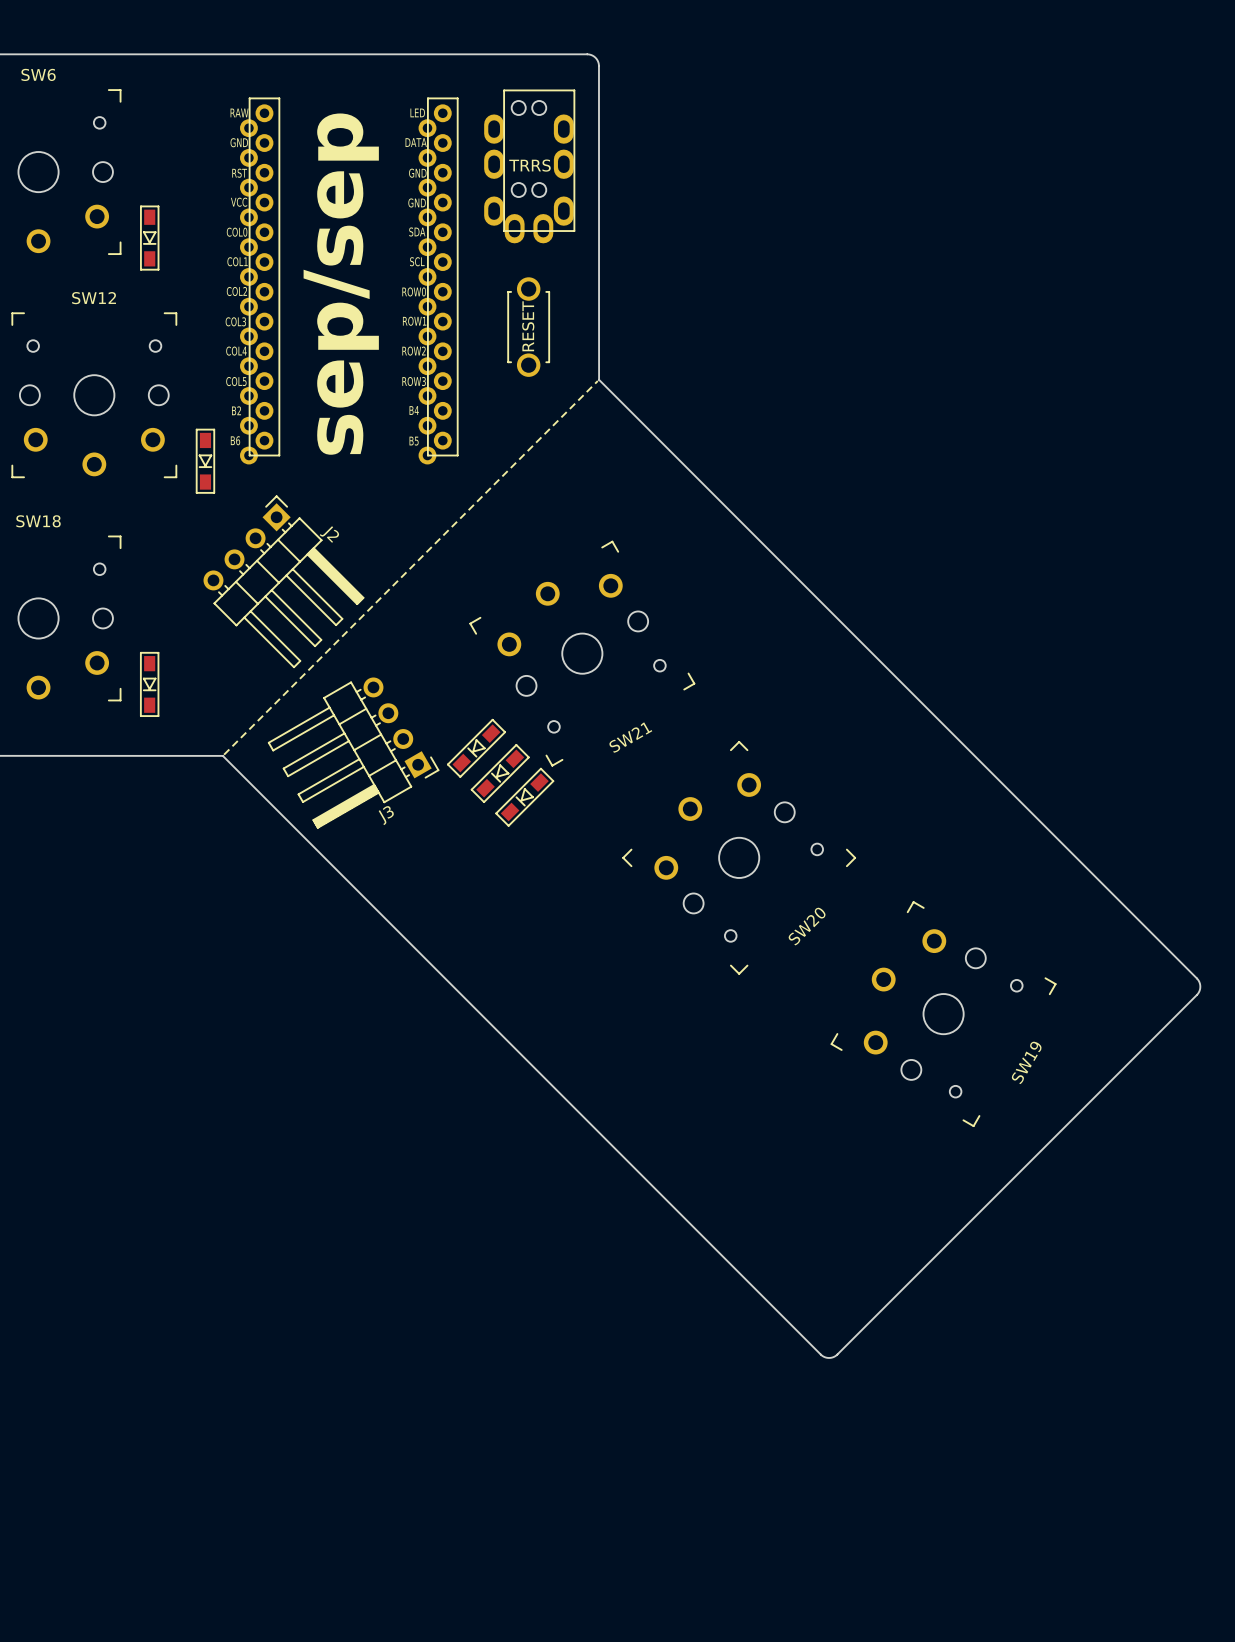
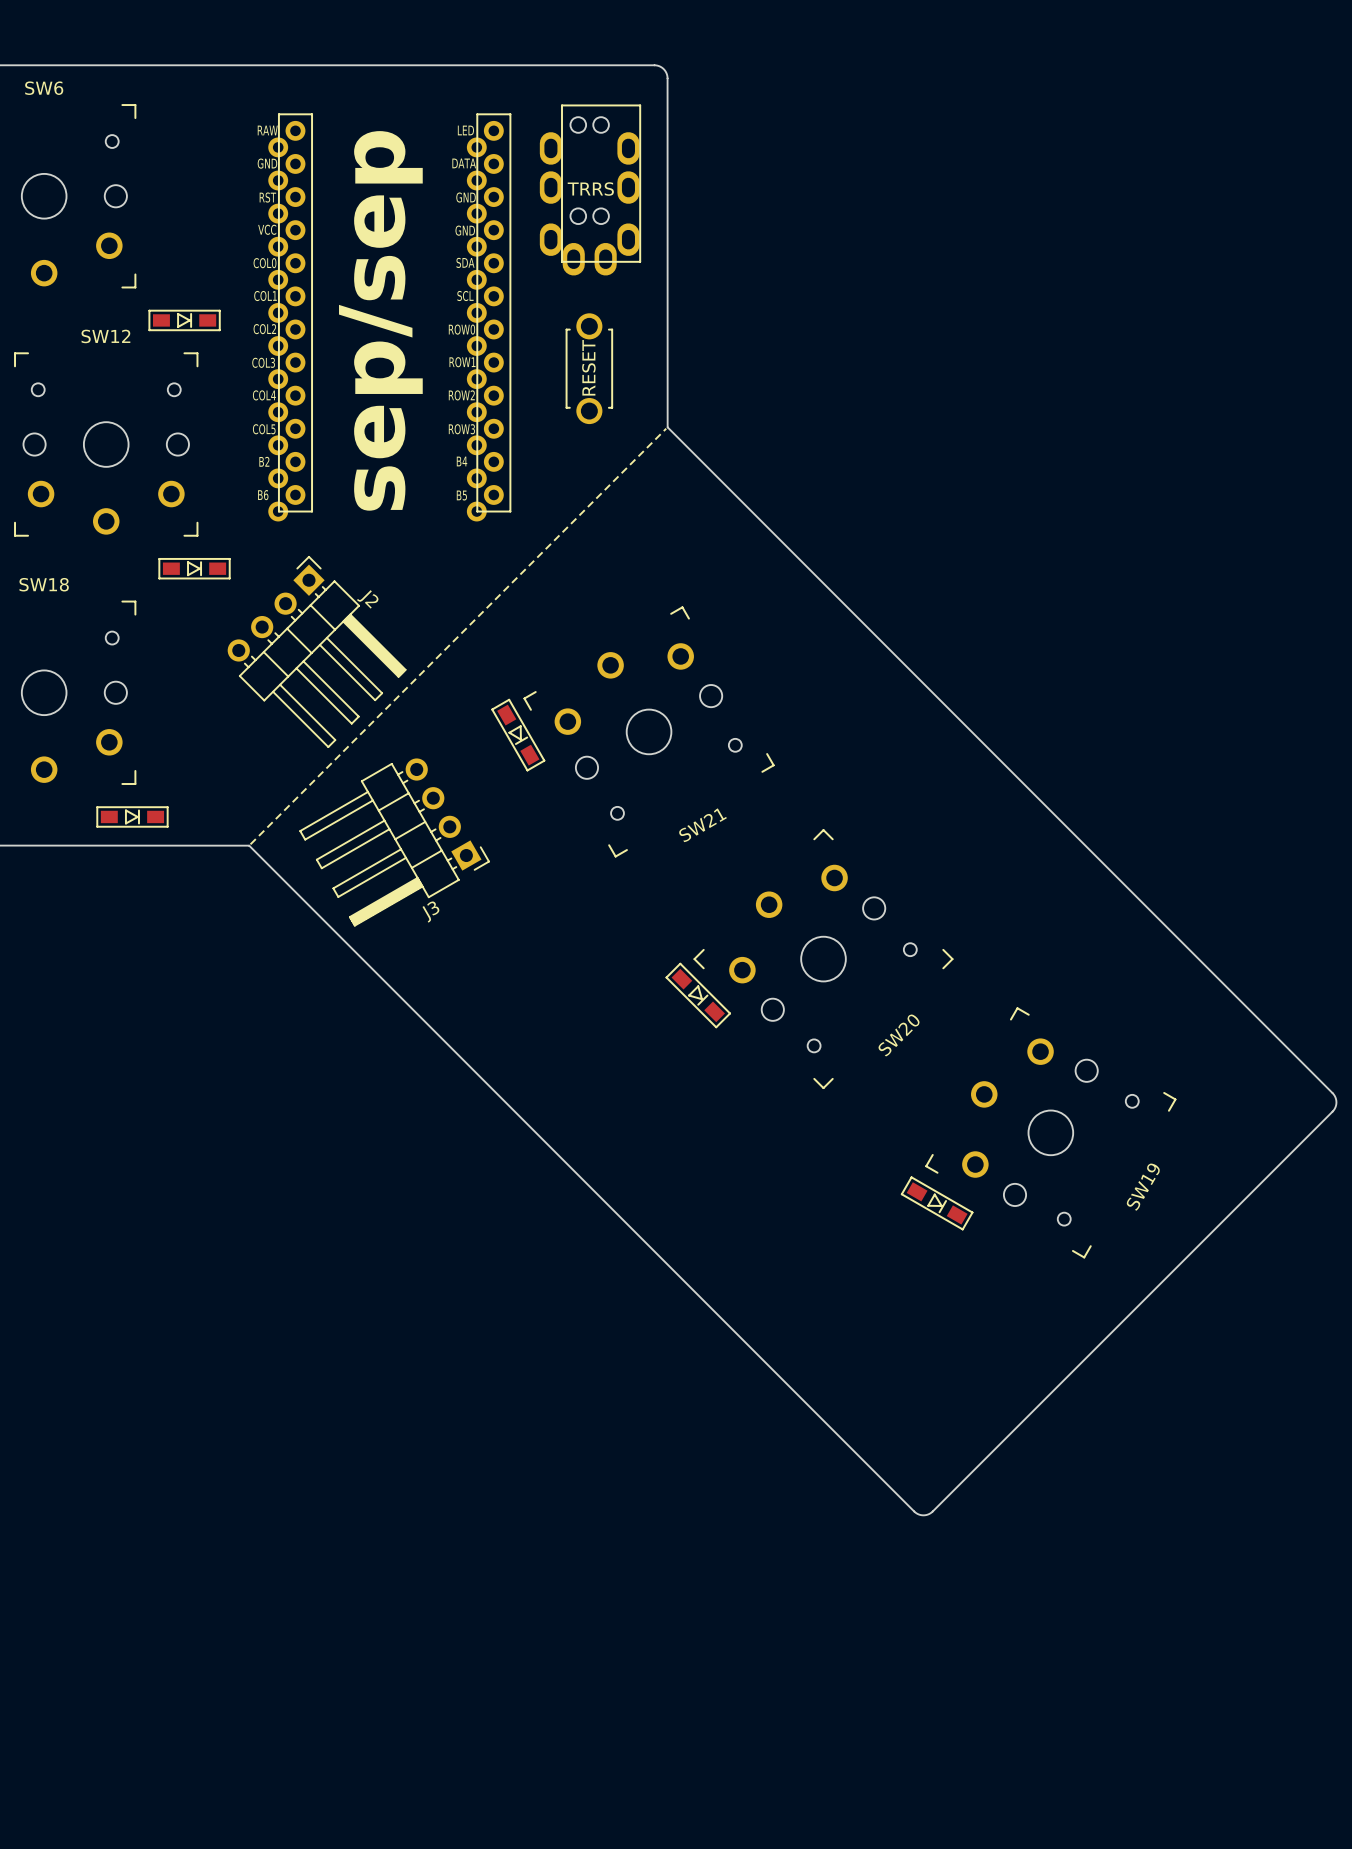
part rotation: 0° (149, 238) -> 90° counterclockwise (184, 320)
part position: (149, 238) -> (184, 320)
part rotation: 0° (205, 461) -> 90° counterclockwise (194, 568)
part position: (205, 461) -> (194, 568)
part: none -> (518, 735)
part rotation: 0° (149, 684) -> 90° counterclockwise (132, 816)
part position: (149, 684) -> (132, 816)
part: (476, 748) -> none
part: (500, 773) -> none
part: (524, 797) -> none
part: none -> (698, 995)
part: none -> (937, 1203)

